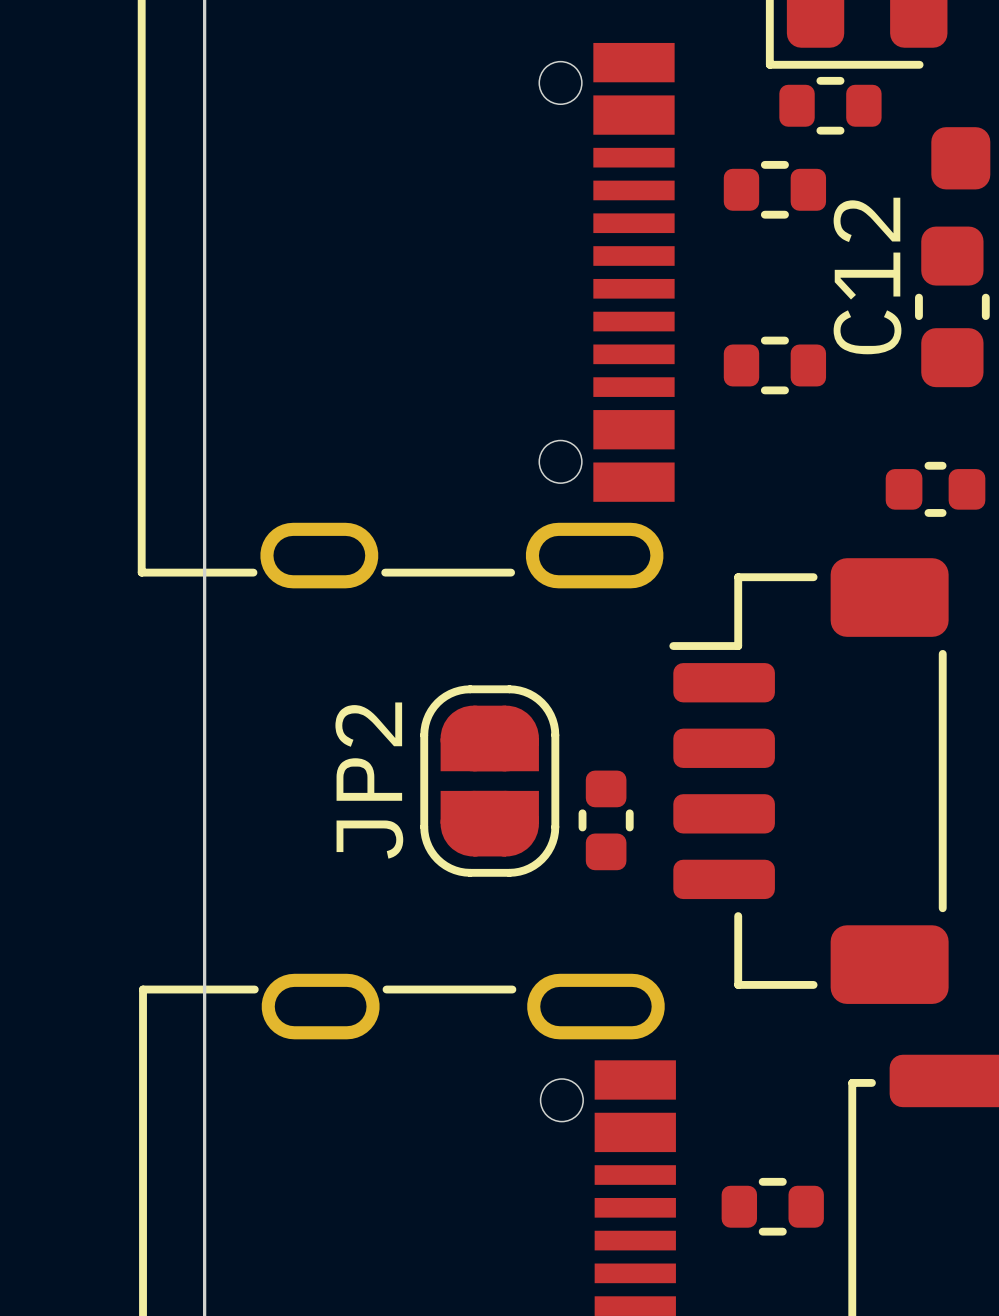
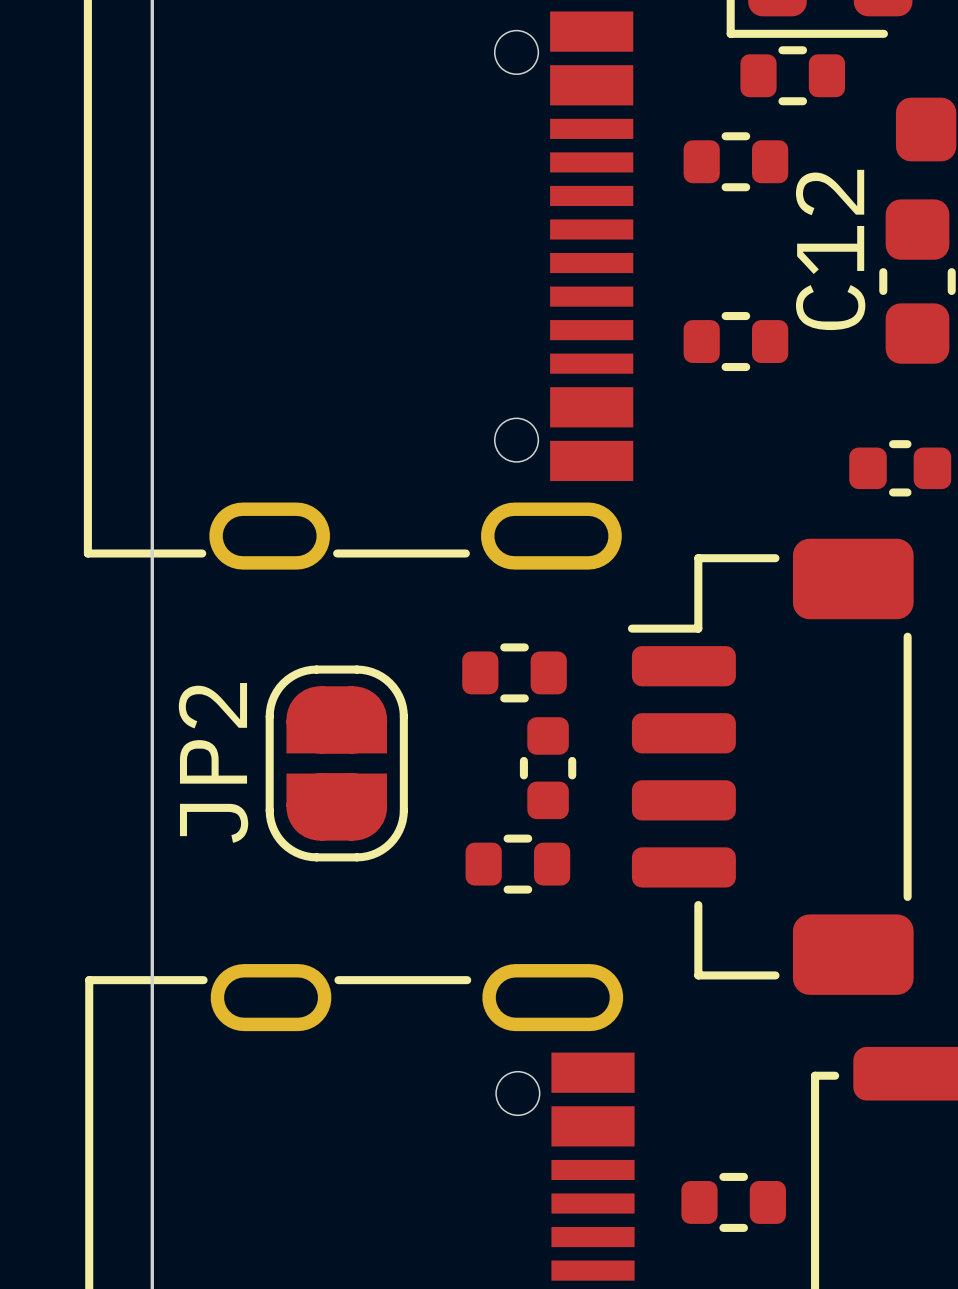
part: none -> (514, 672)
JP2 position: (489, 781) -> (336, 763)
part position: (606, 820) -> (548, 768)
part: none -> (517, 864)

